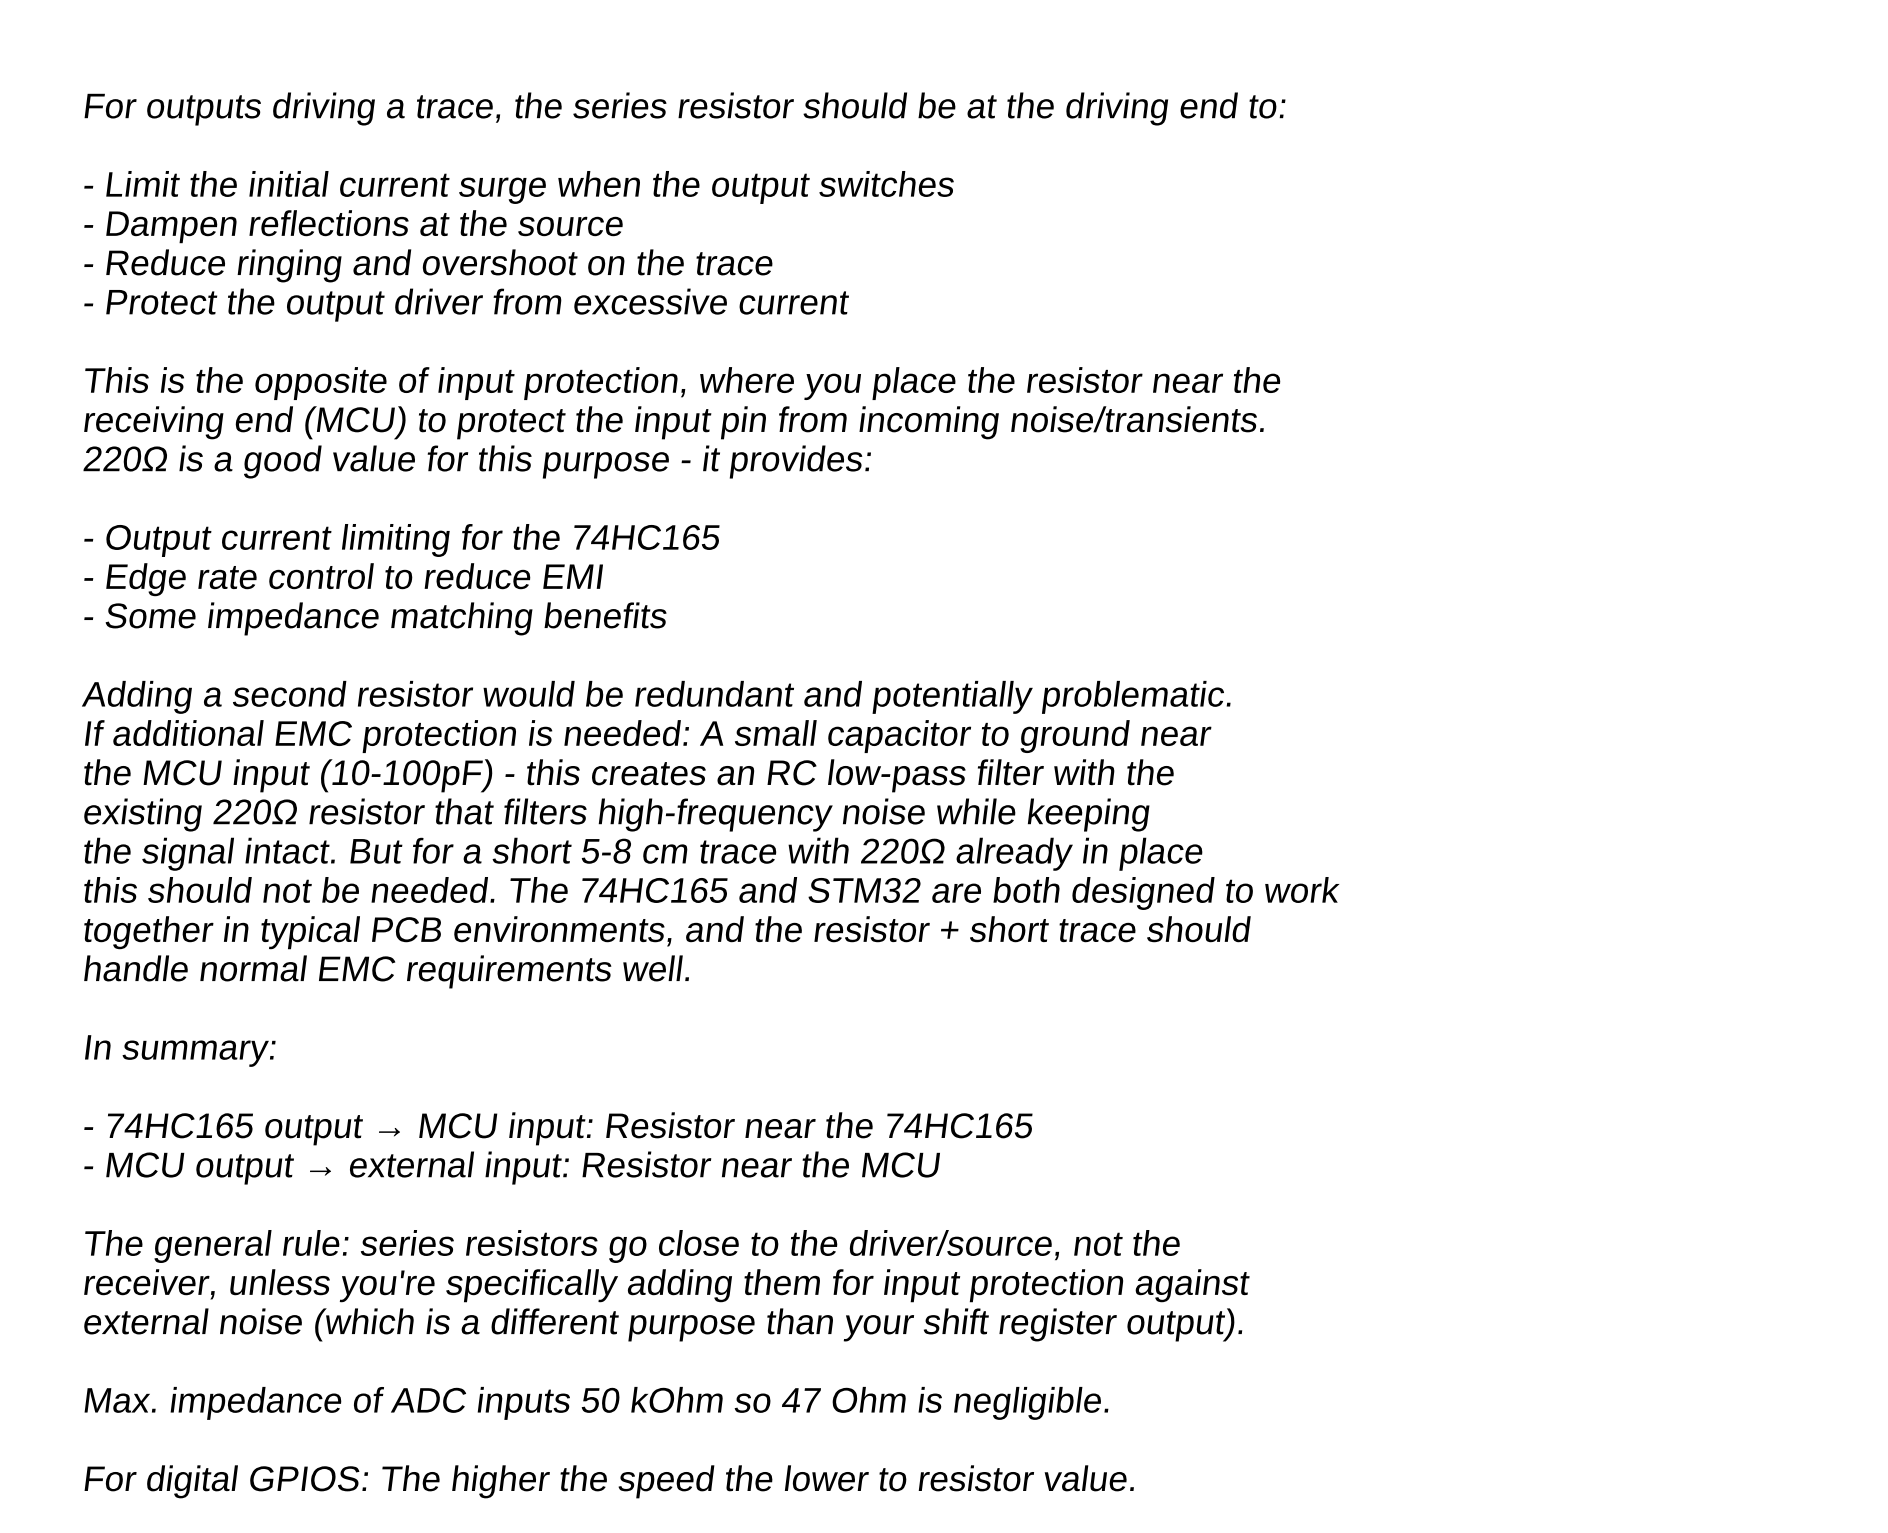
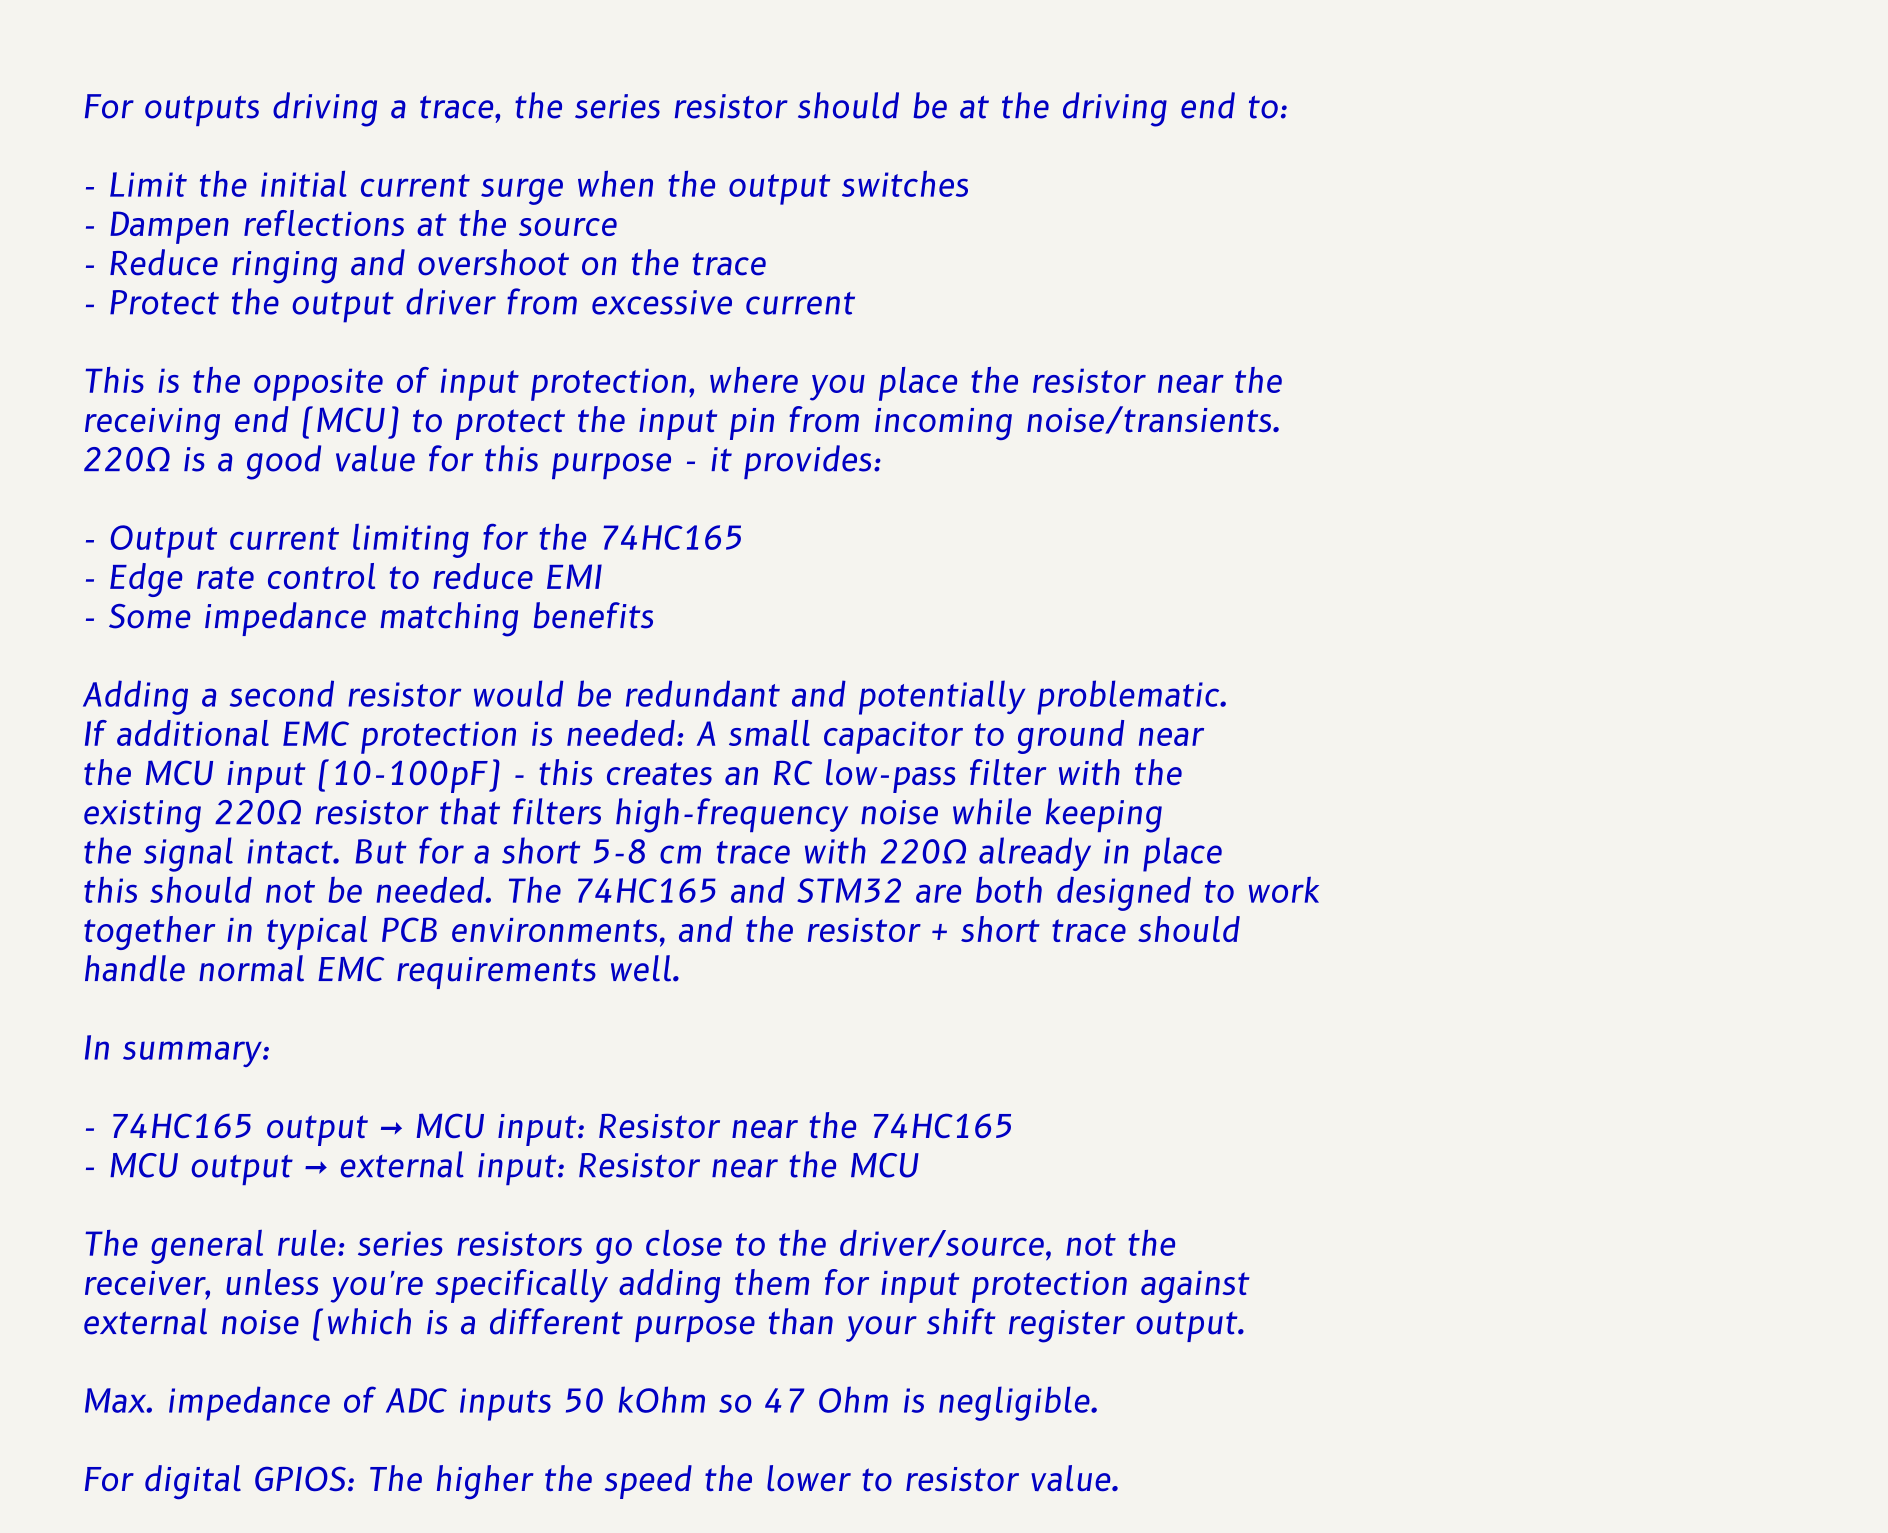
text: external noise (which is a different purpose than your shift register output). (663, 1324) -> external noise (which is a different purpose than your shift register output. (663, 1325)

